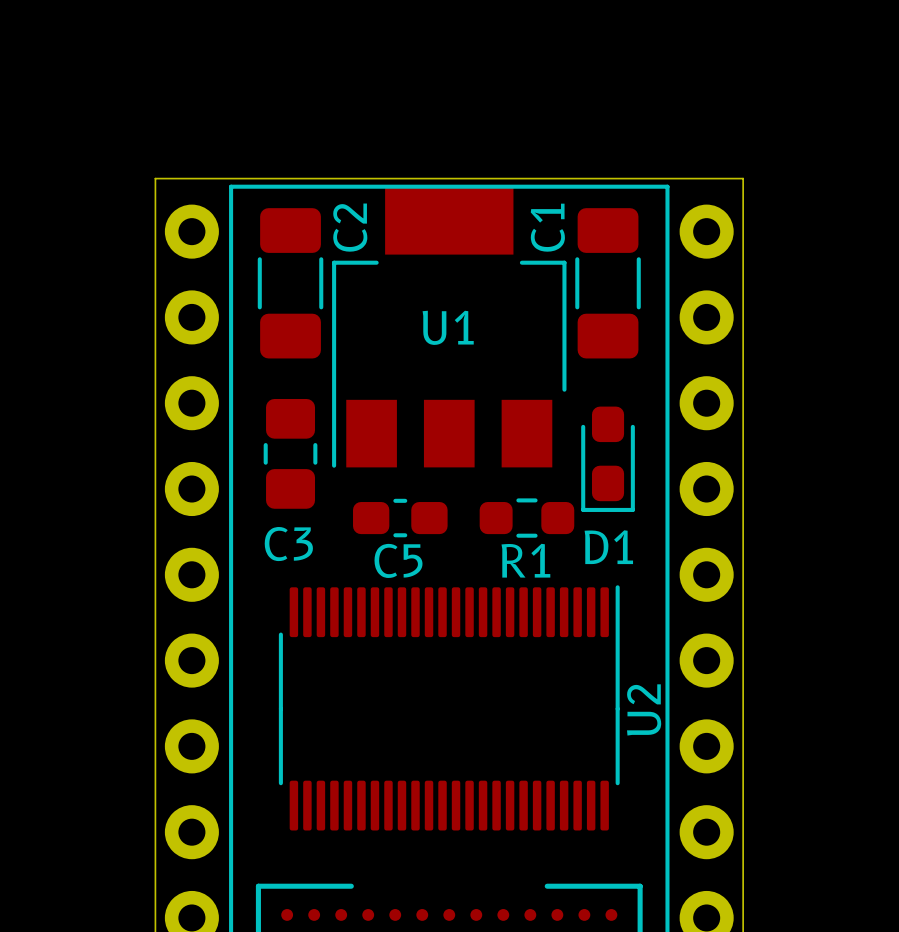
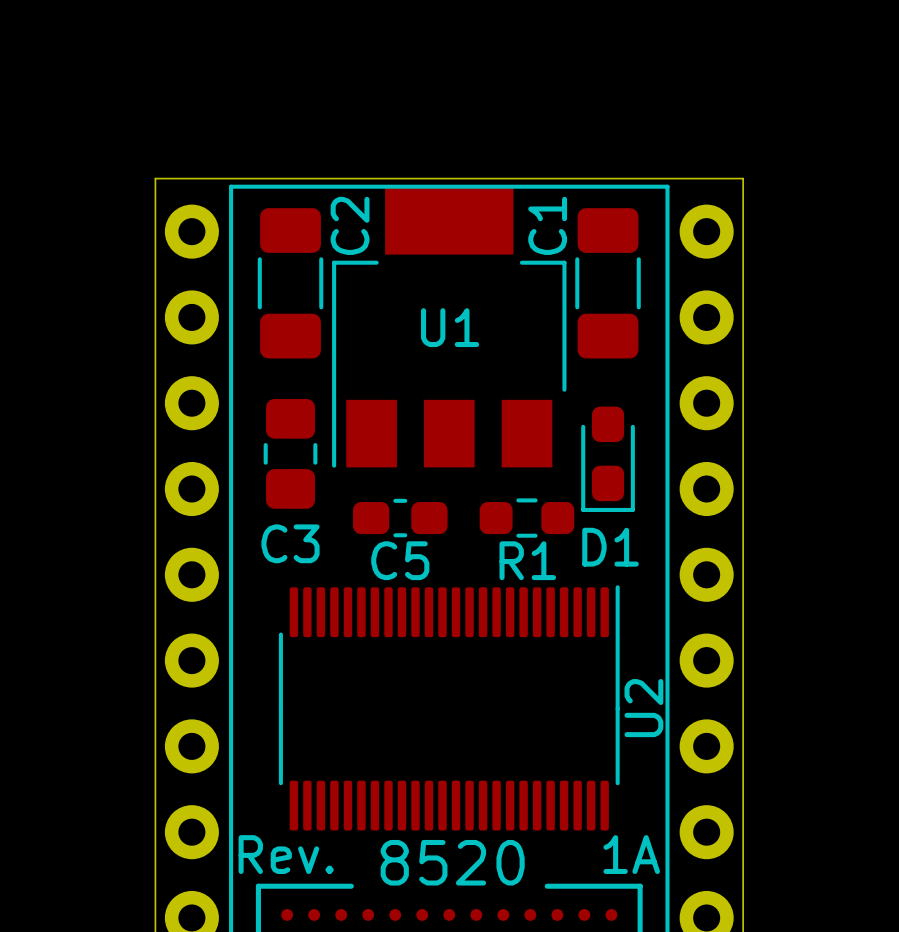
text: none -> Rev. (286, 854)
text: none -> 1A (631, 854)
text: none -> 8520 (452, 862)

